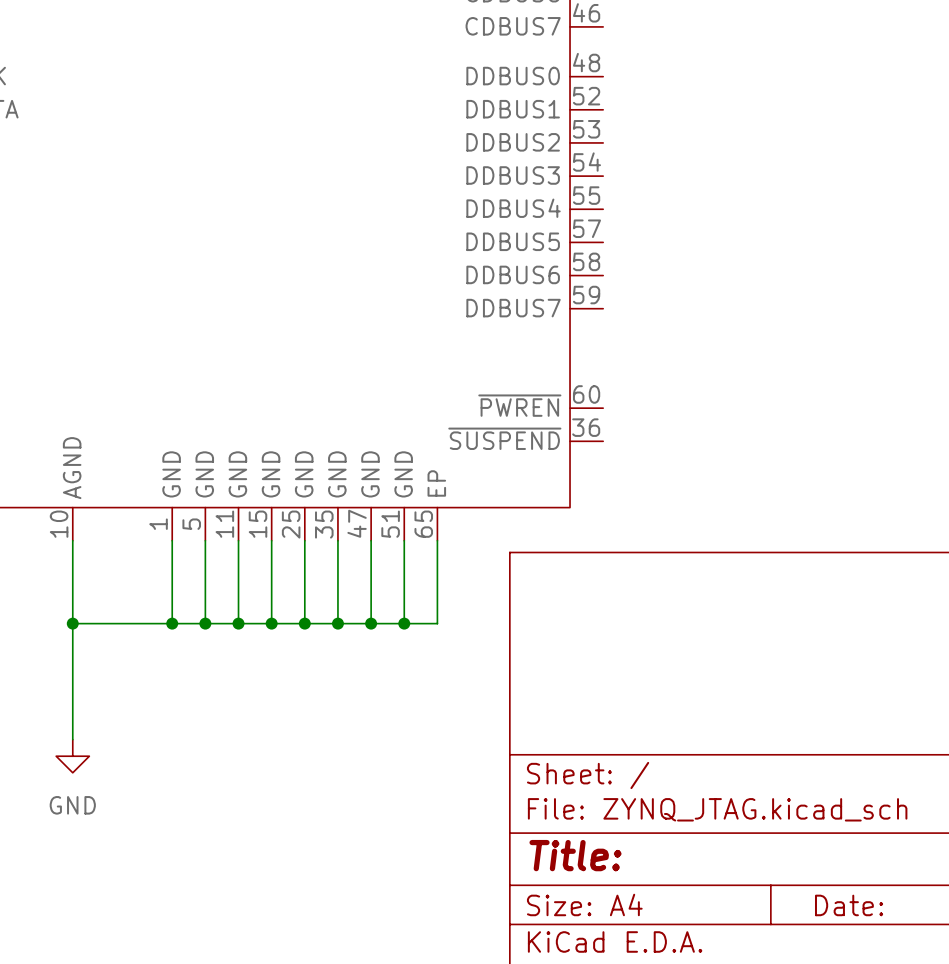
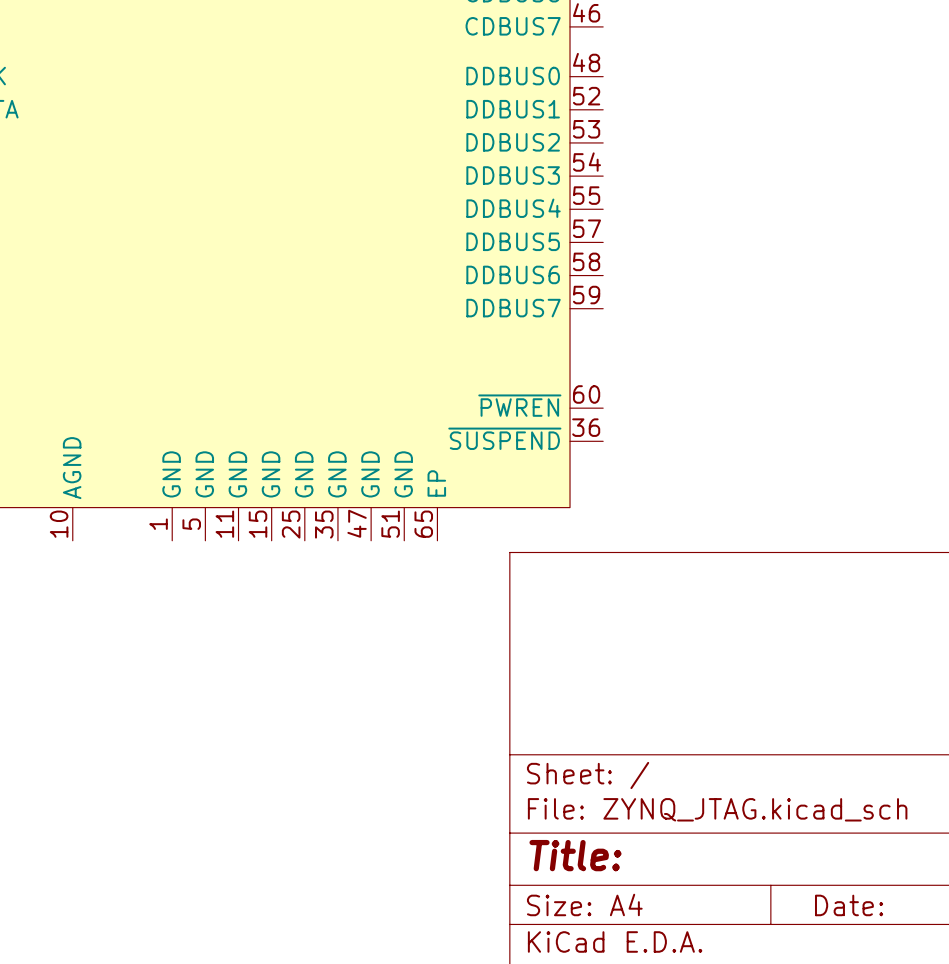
wire: (72, 540) (72, 739) -> none
wire: (172, 540) (172, 623) -> none
wire: (205, 540) (205, 623) -> none
wire: (238, 540) (238, 623) -> none
wire: (271, 540) (271, 623) -> none
wire: (304, 540) (304, 623) -> none
wire: (337, 540) (337, 623) -> none
wire: (371, 540) (371, 623) -> none
wire: (404, 540) (404, 623) -> none
wire: (437, 540) (437, 623) (72, 623) -> none
junction: (72, 623) -> none
junction: (172, 623) -> none
junction: (205, 623) -> none
junction: (238, 623) -> none
junction: (271, 623) -> none
junction: (304, 623) -> none
junction: (337, 623) -> none
junction: (371, 623) -> none
junction: (404, 623) -> none
power symbol: GND (72, 756) -> none

